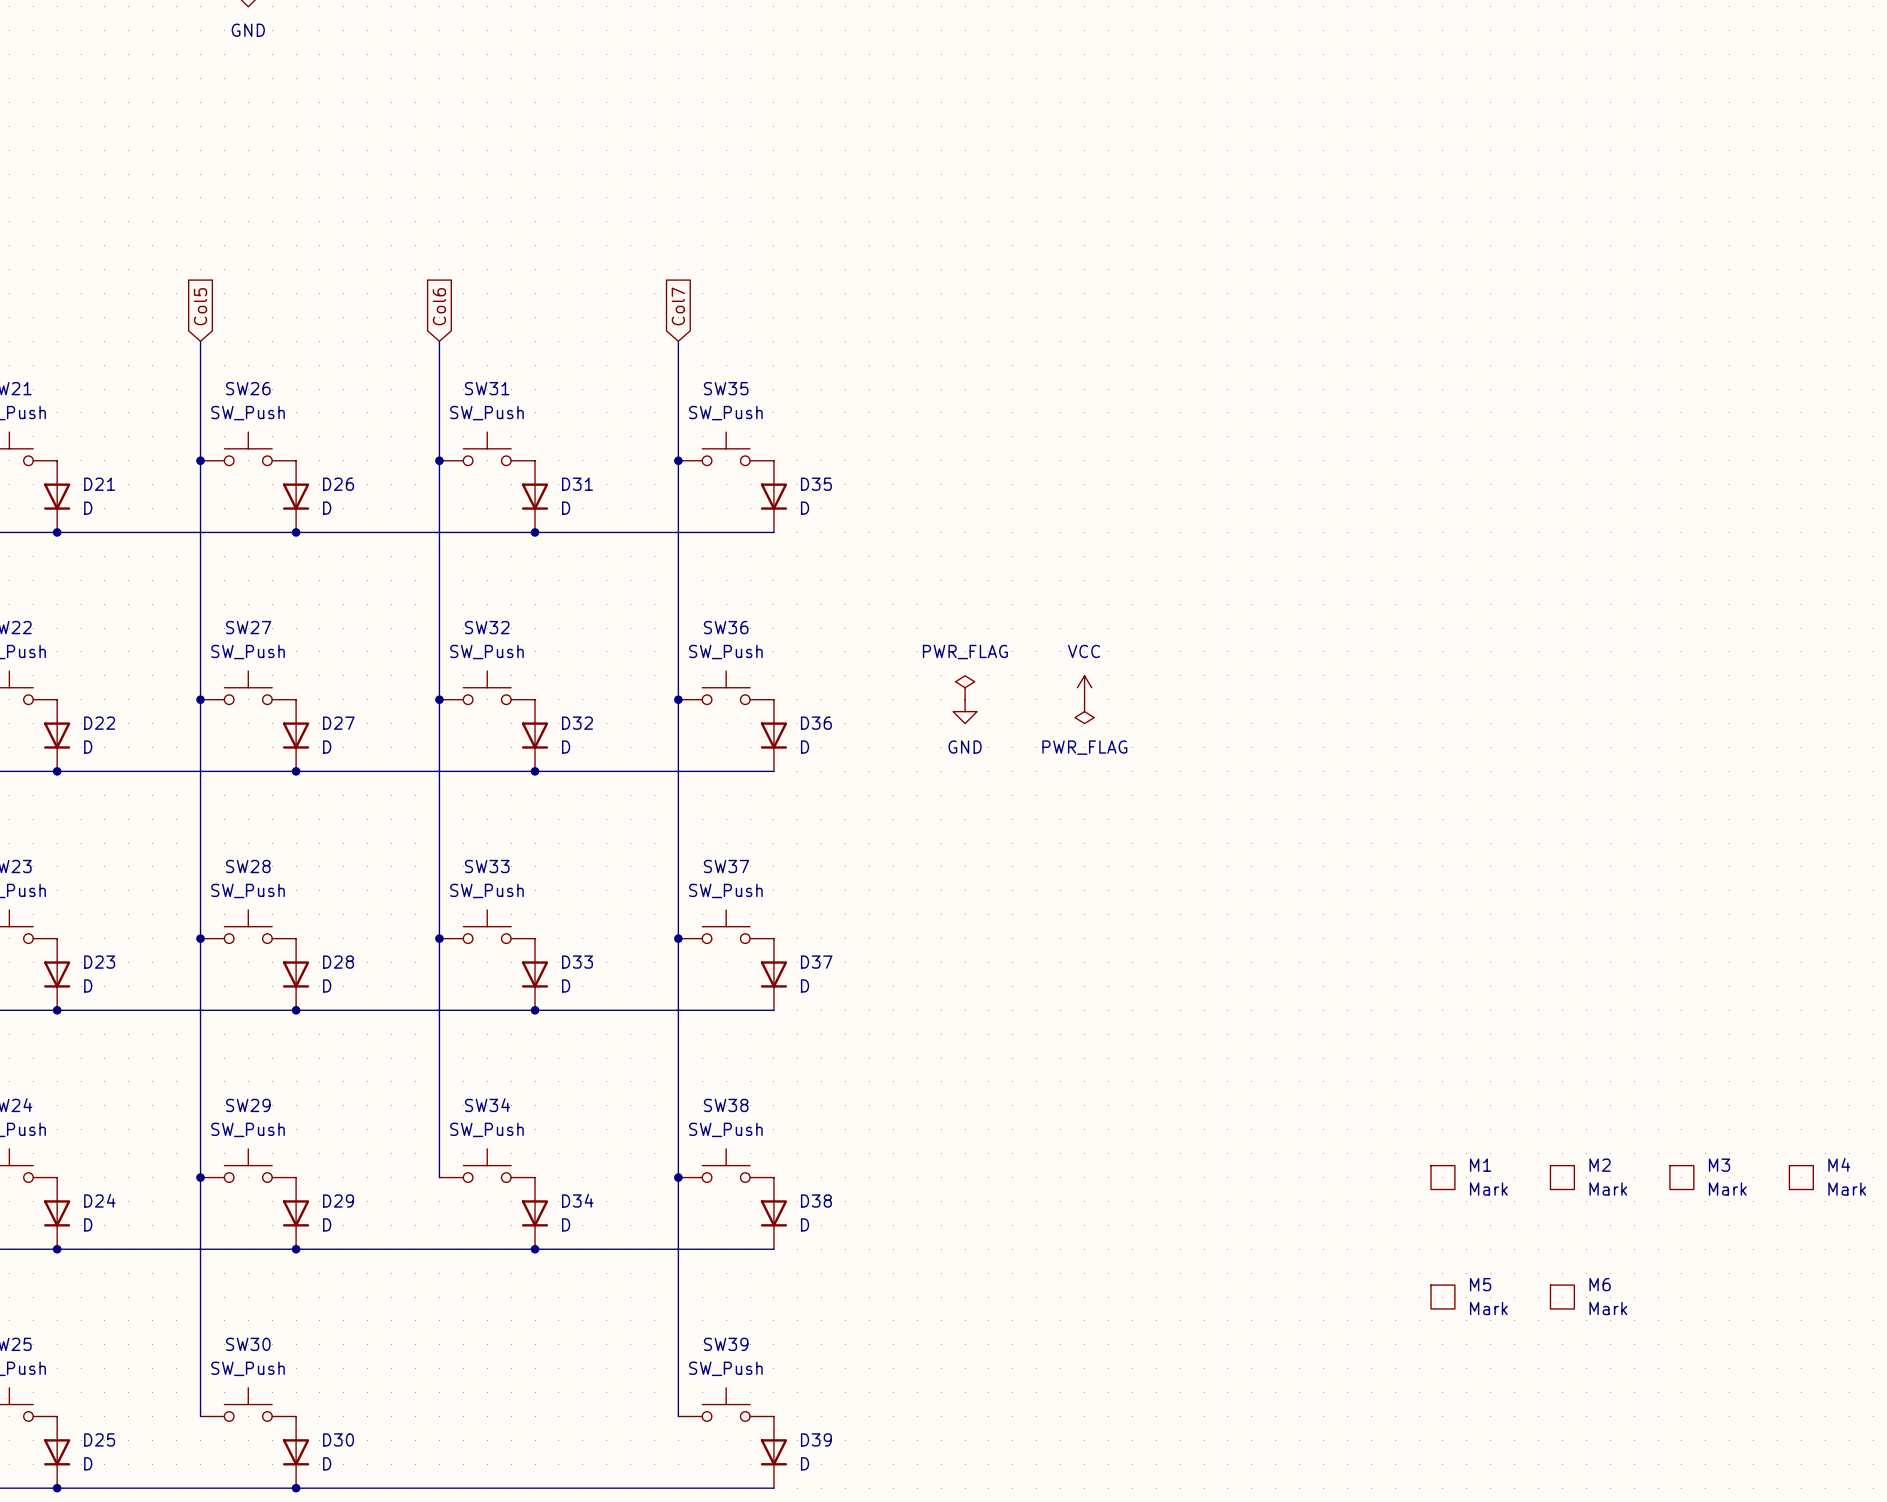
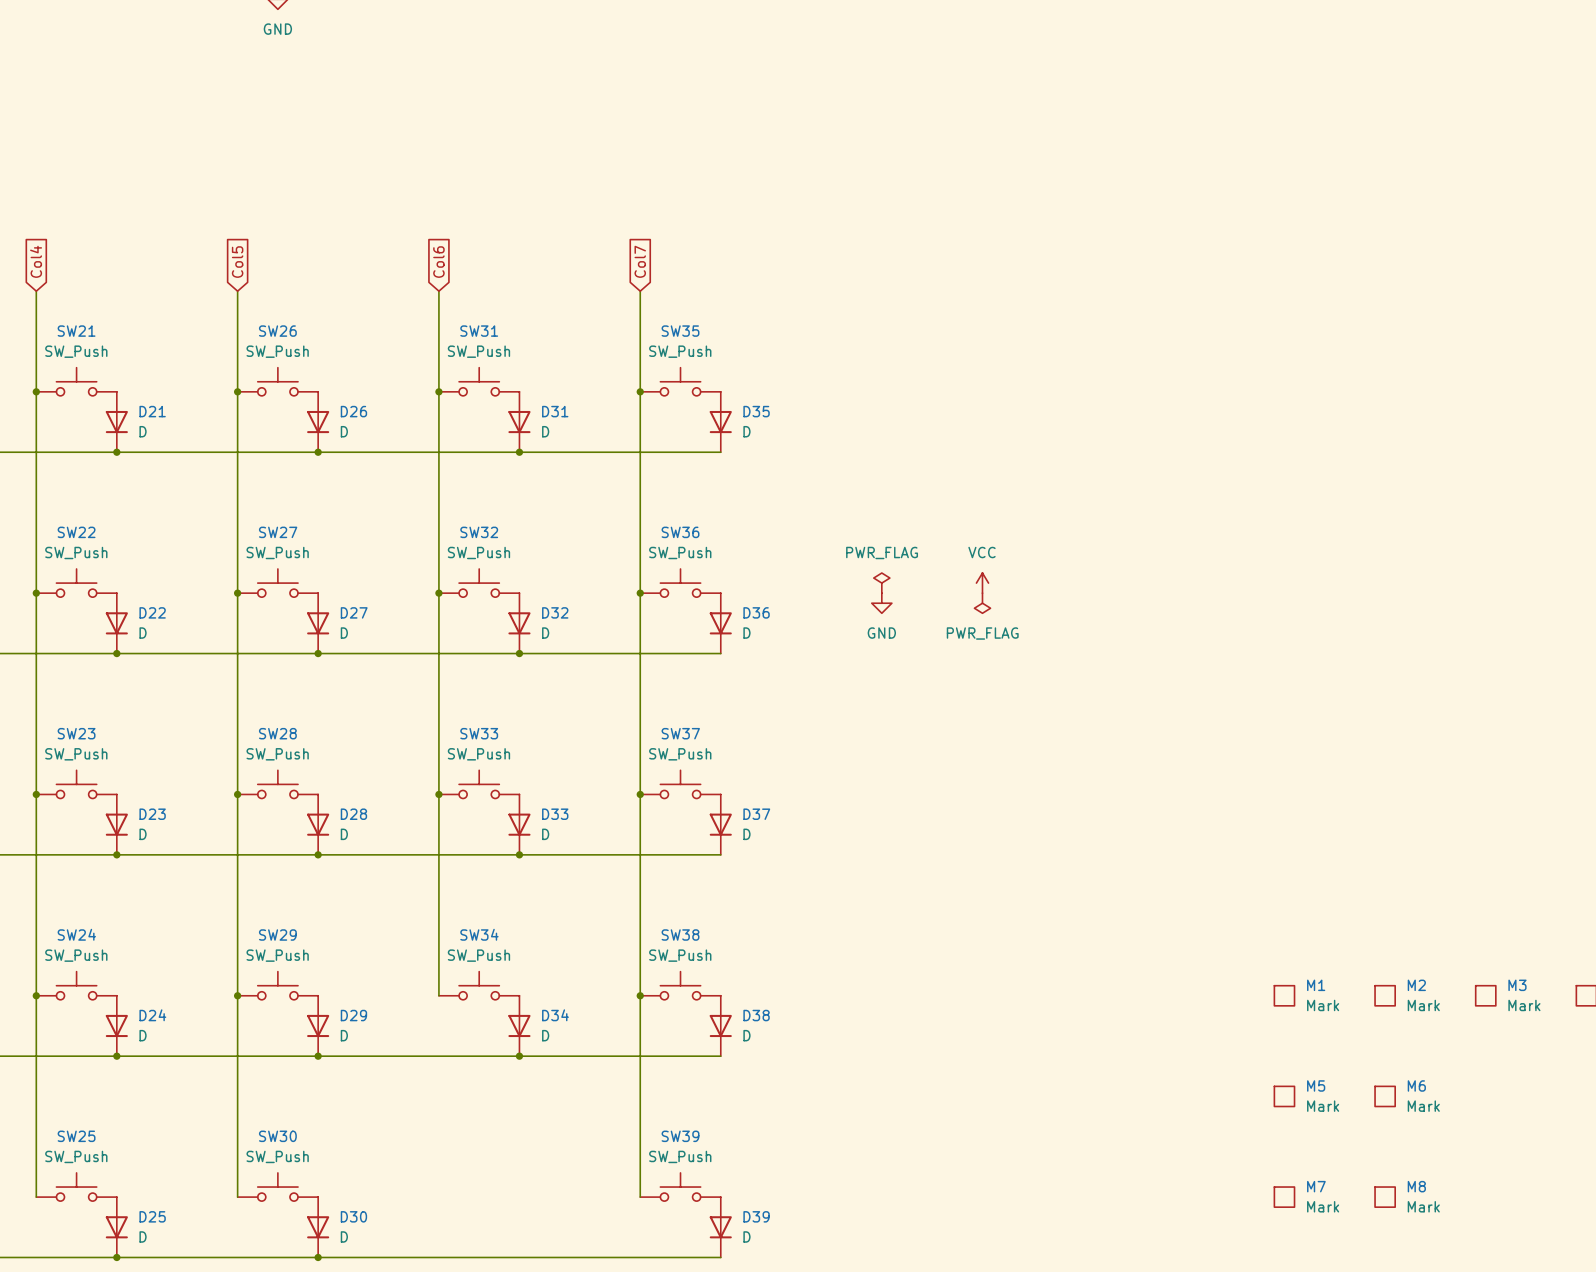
M7: none -> Mark (1284, 1197)
M8: none -> Mark (1385, 1197)

